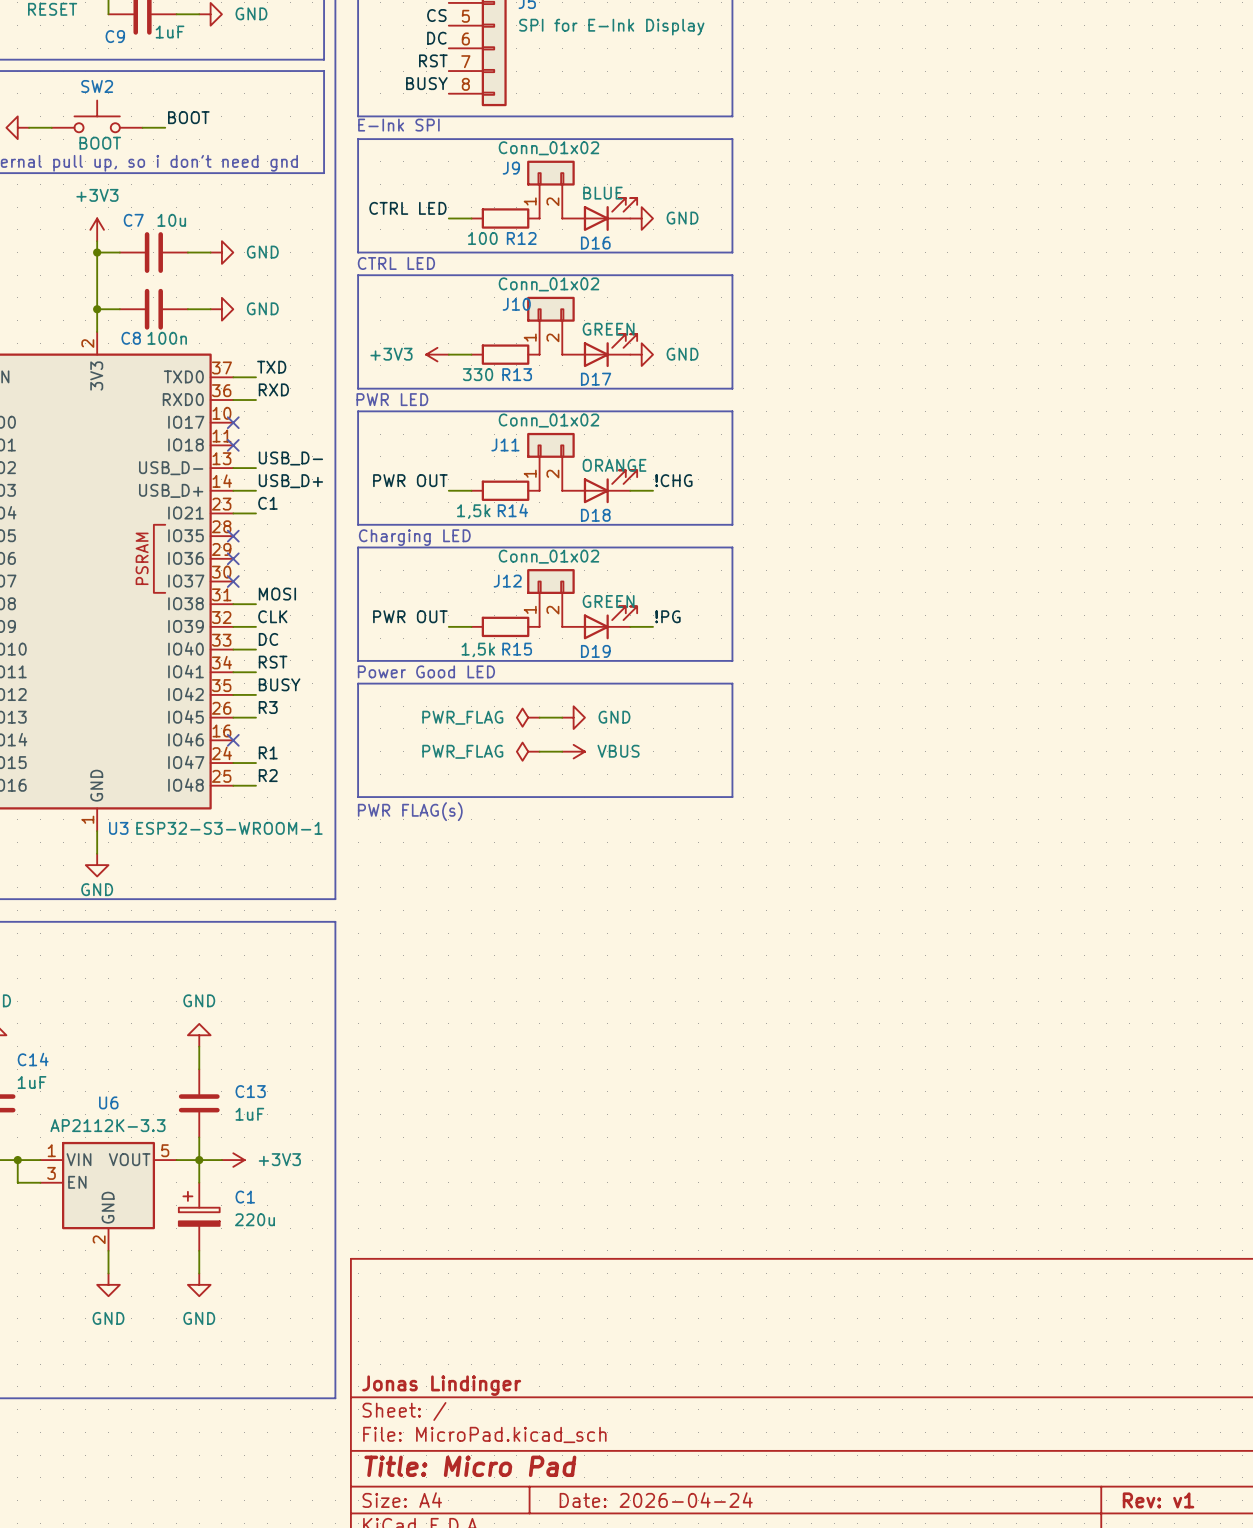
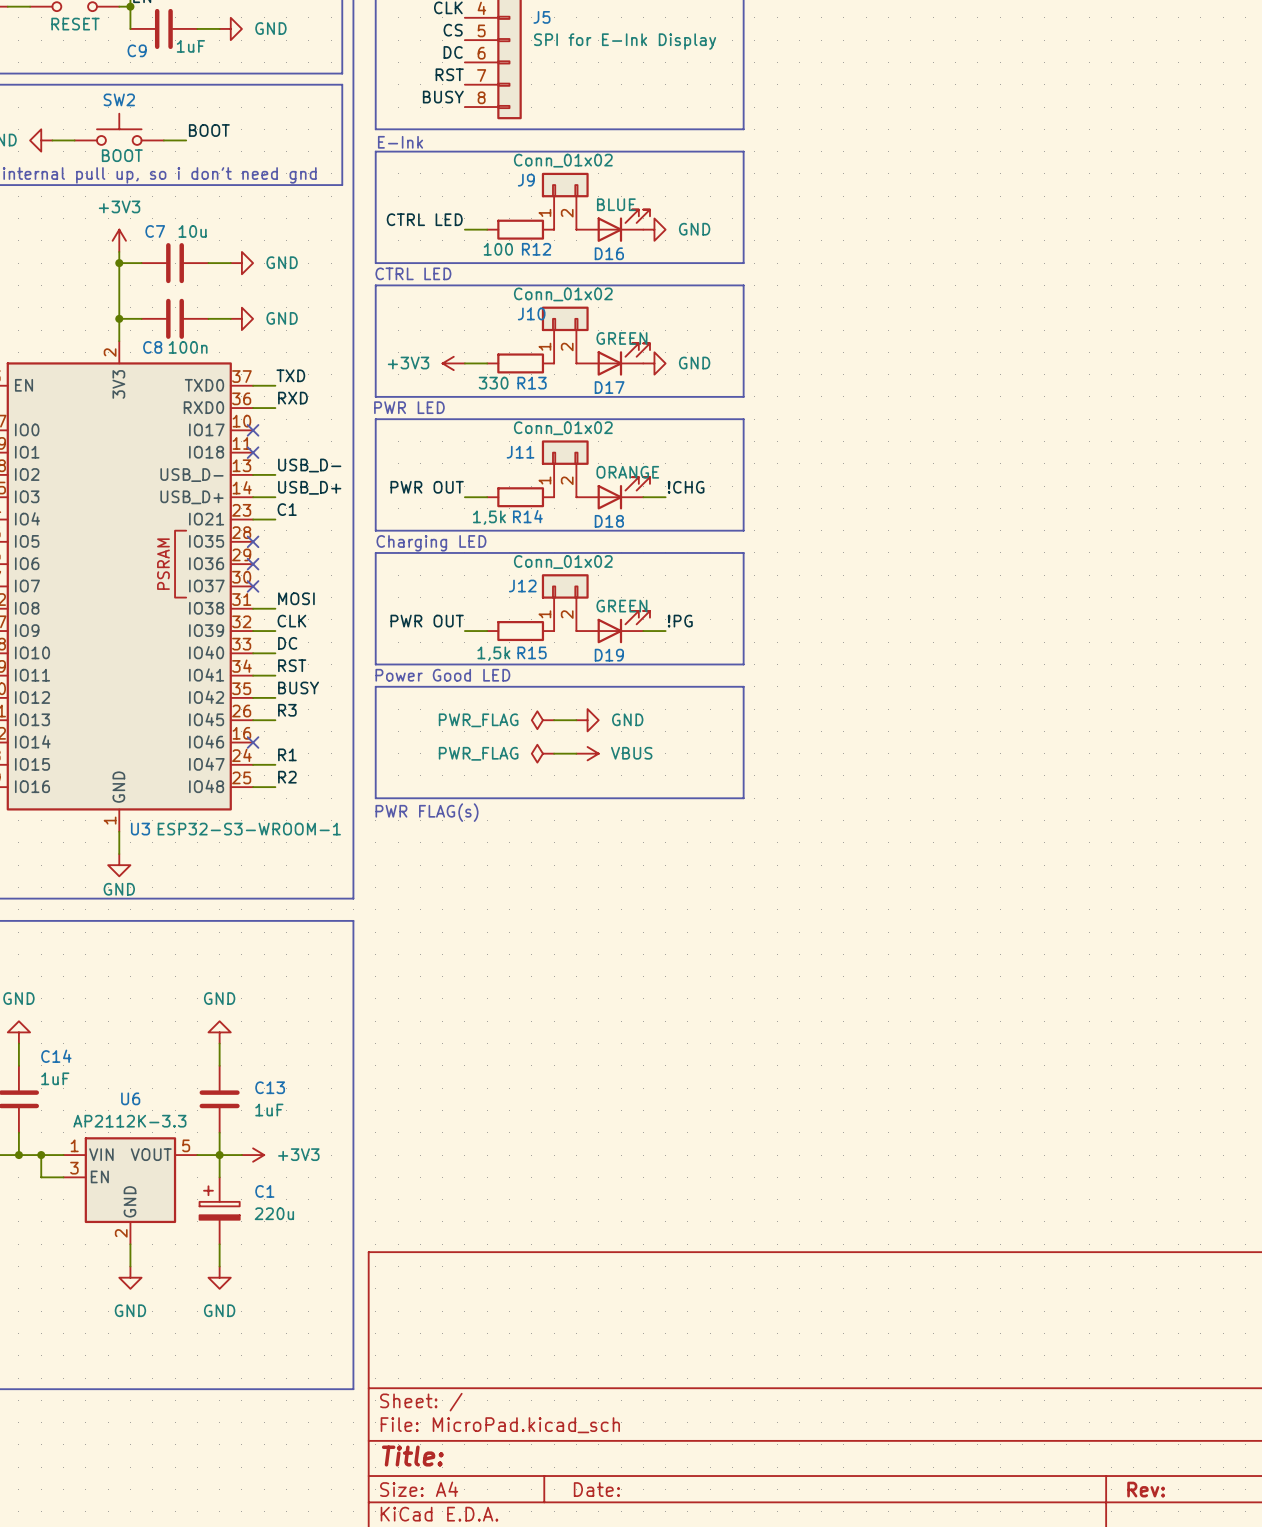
text: E-Ink SPI (398, 125) -> E-Ink (400, 142)
title block: Jonas Lindinger (441, 1385) -> none
title block: Title: Micro Pad (470, 1466) -> Title: (412, 1456)
title block: Date: 2026-04-24 (656, 1500) -> Date: (596, 1489)
title block: Rev: v1 (1158, 1500) -> Rev: (1146, 1489)

